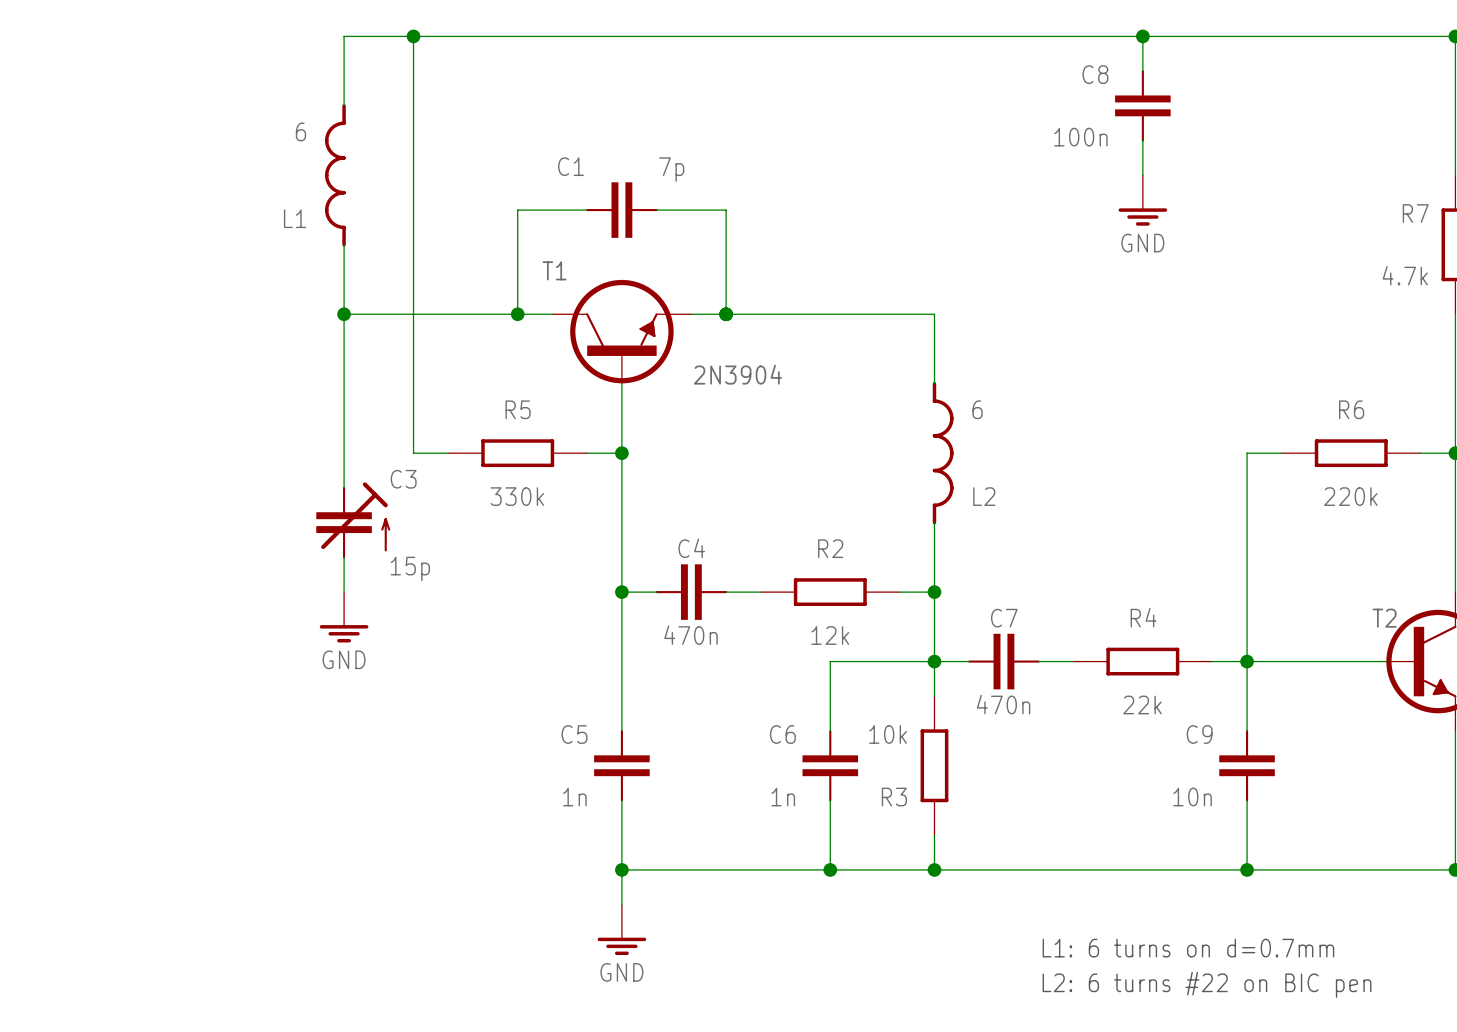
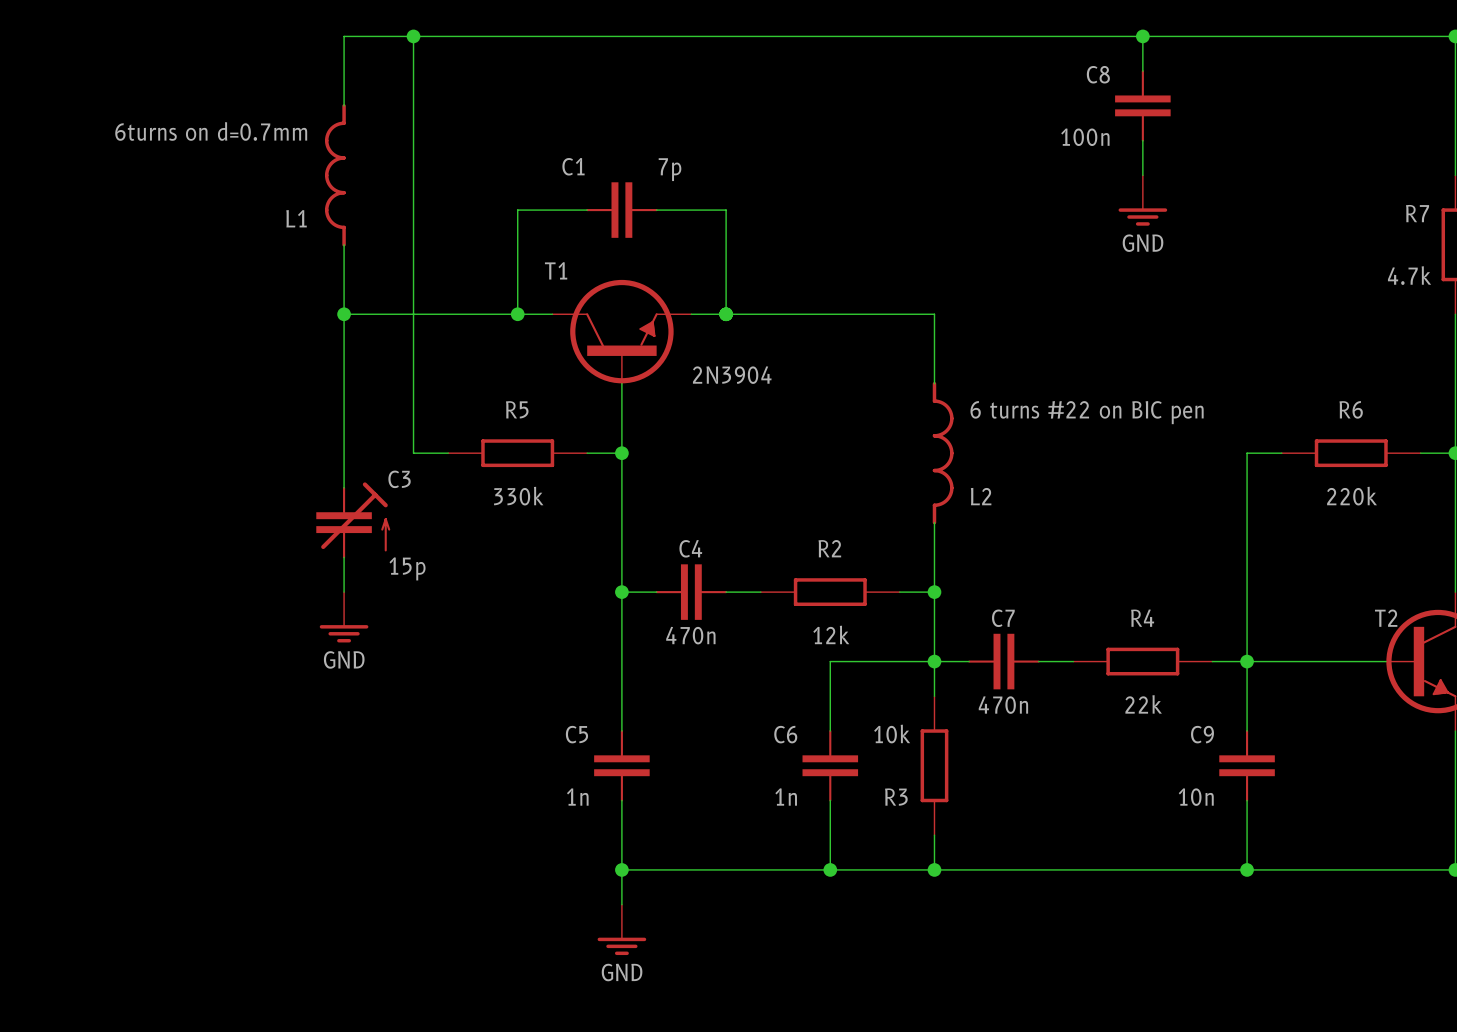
L1 value: 6 (300, 131) -> 6turns on d=0.7mm (211, 131)
L2 value: 6 (977, 409) -> 6 turns #22 on BIC pen (1087, 412)
text: L1: 6 turns on d=0.7mm (1188, 948) -> none
text: L2: 6 turns #22 on BIC pen (1207, 984) -> none

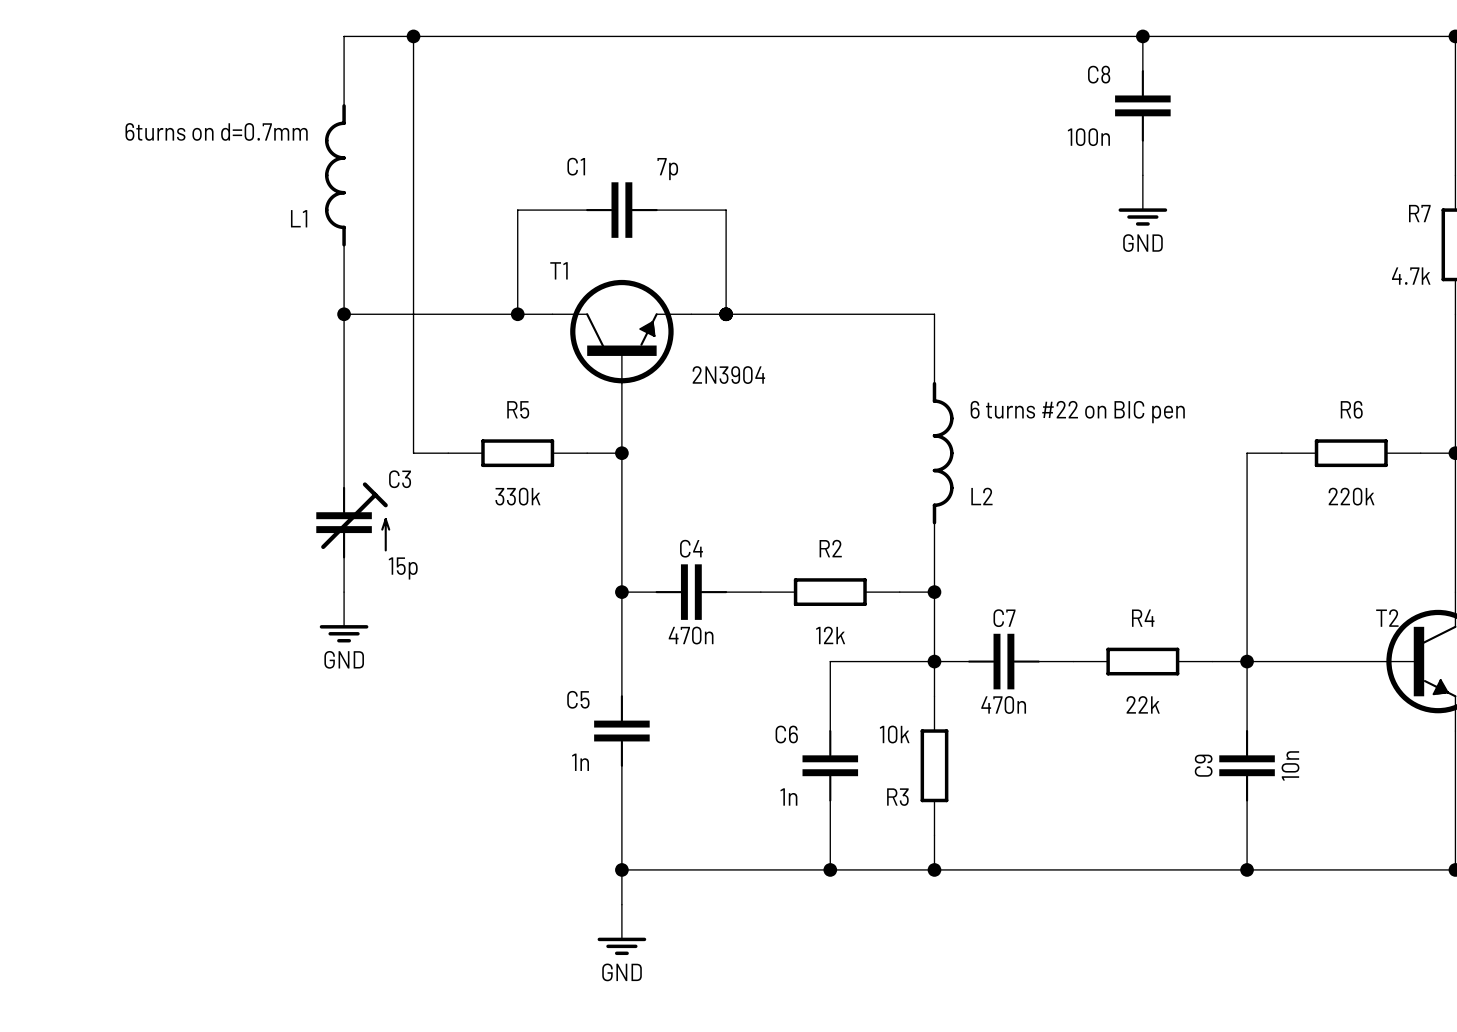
C9 name rotation: 0° (1202, 734) -> 90° counterclockwise (1203, 765)
C5 position: (621, 765) -> (621, 731)
C9 value rotation: 0° (1196, 797) -> 90° counterclockwise (1290, 765)
C9 value position: 10n (1196, 797) -> 10n (1290, 765)

